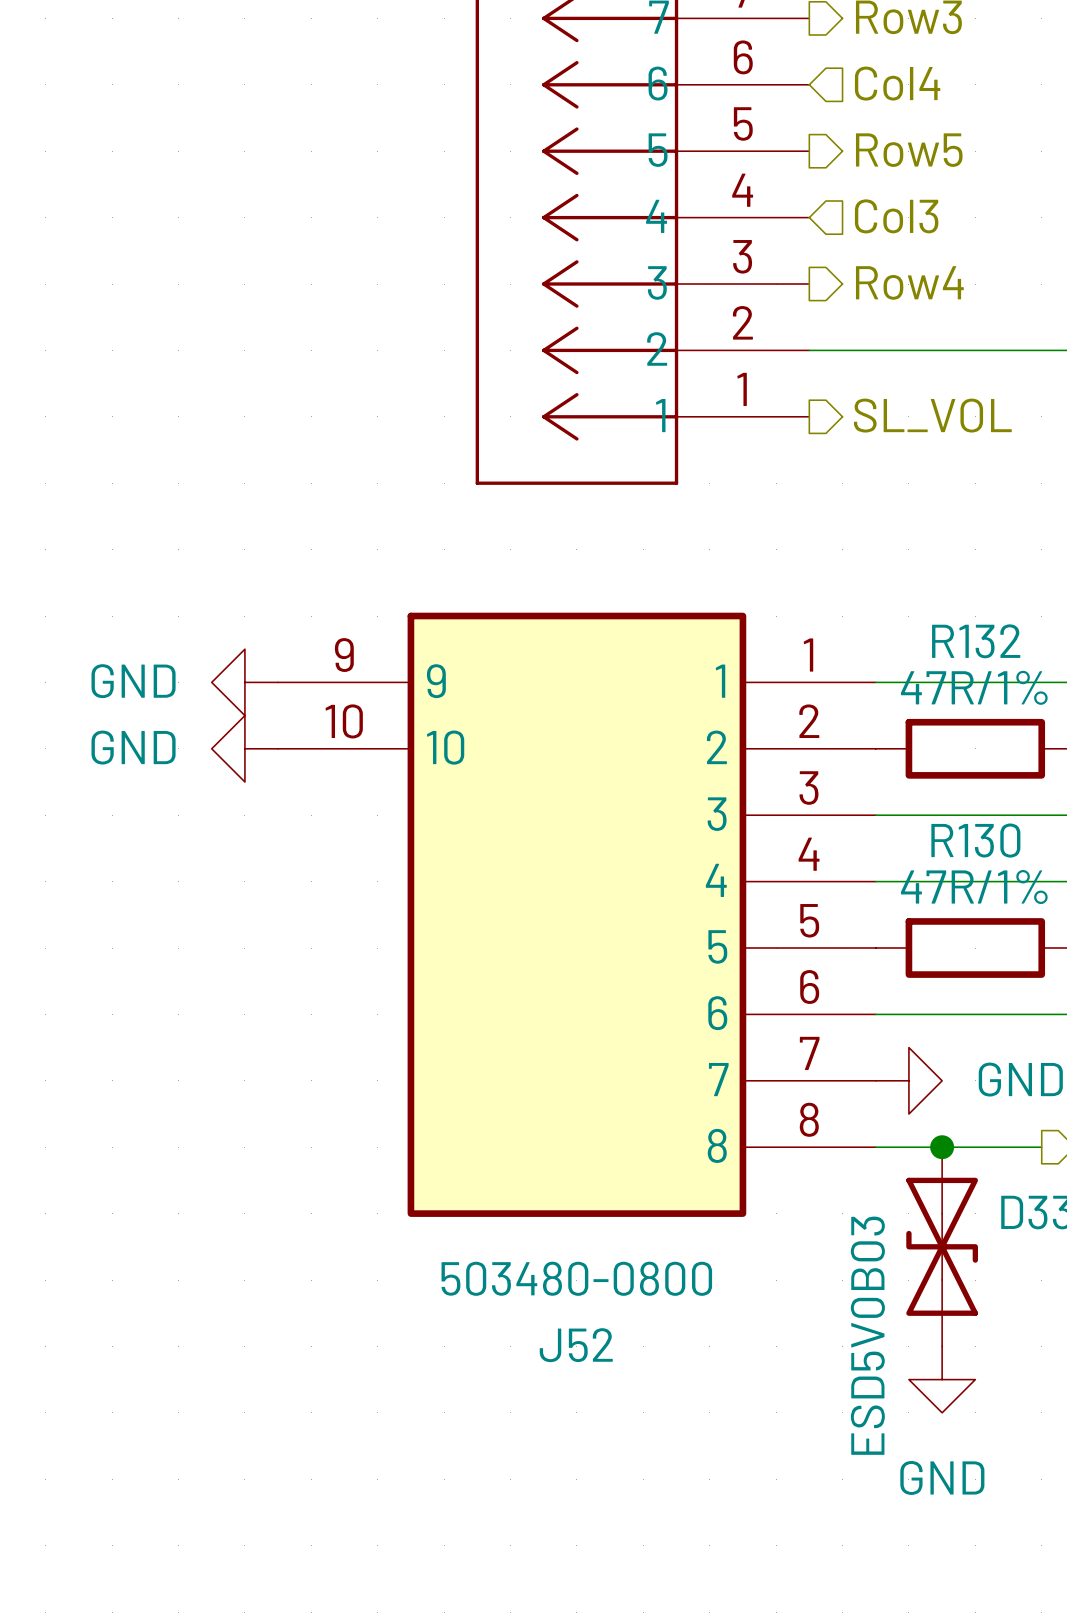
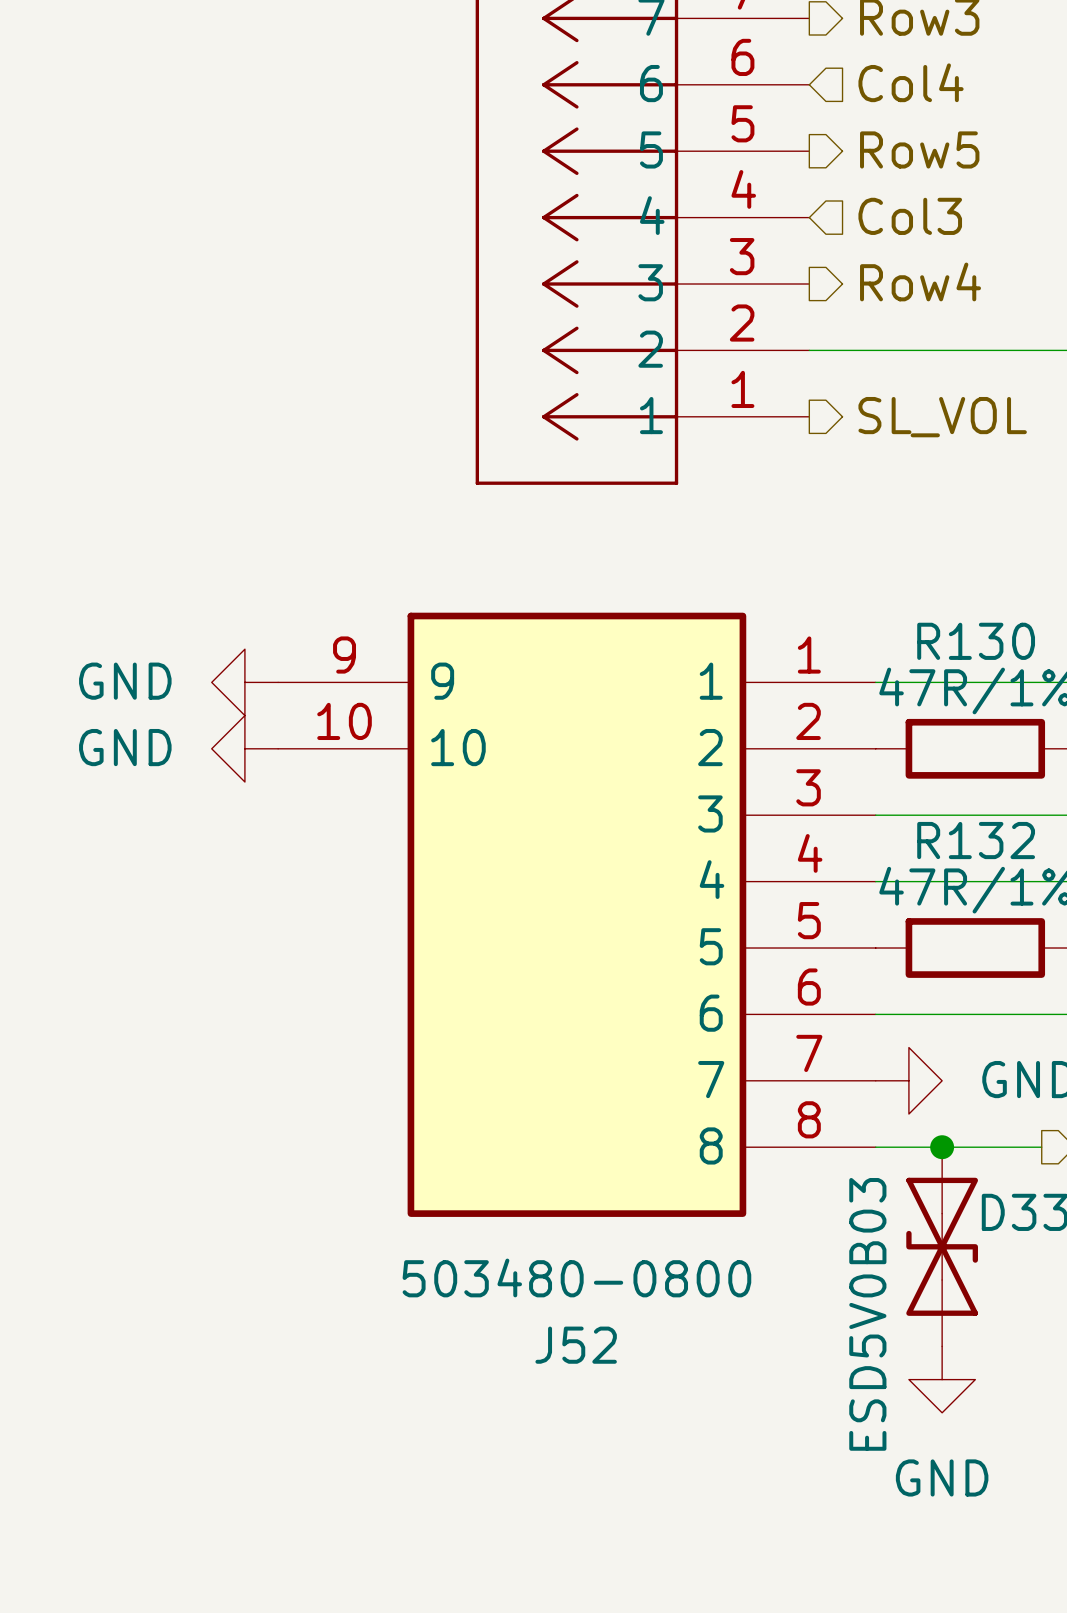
R132 name: R132 (976, 641) -> R130 (976, 641)
R130 name: R130 (975, 840) -> R132 (976, 840)

